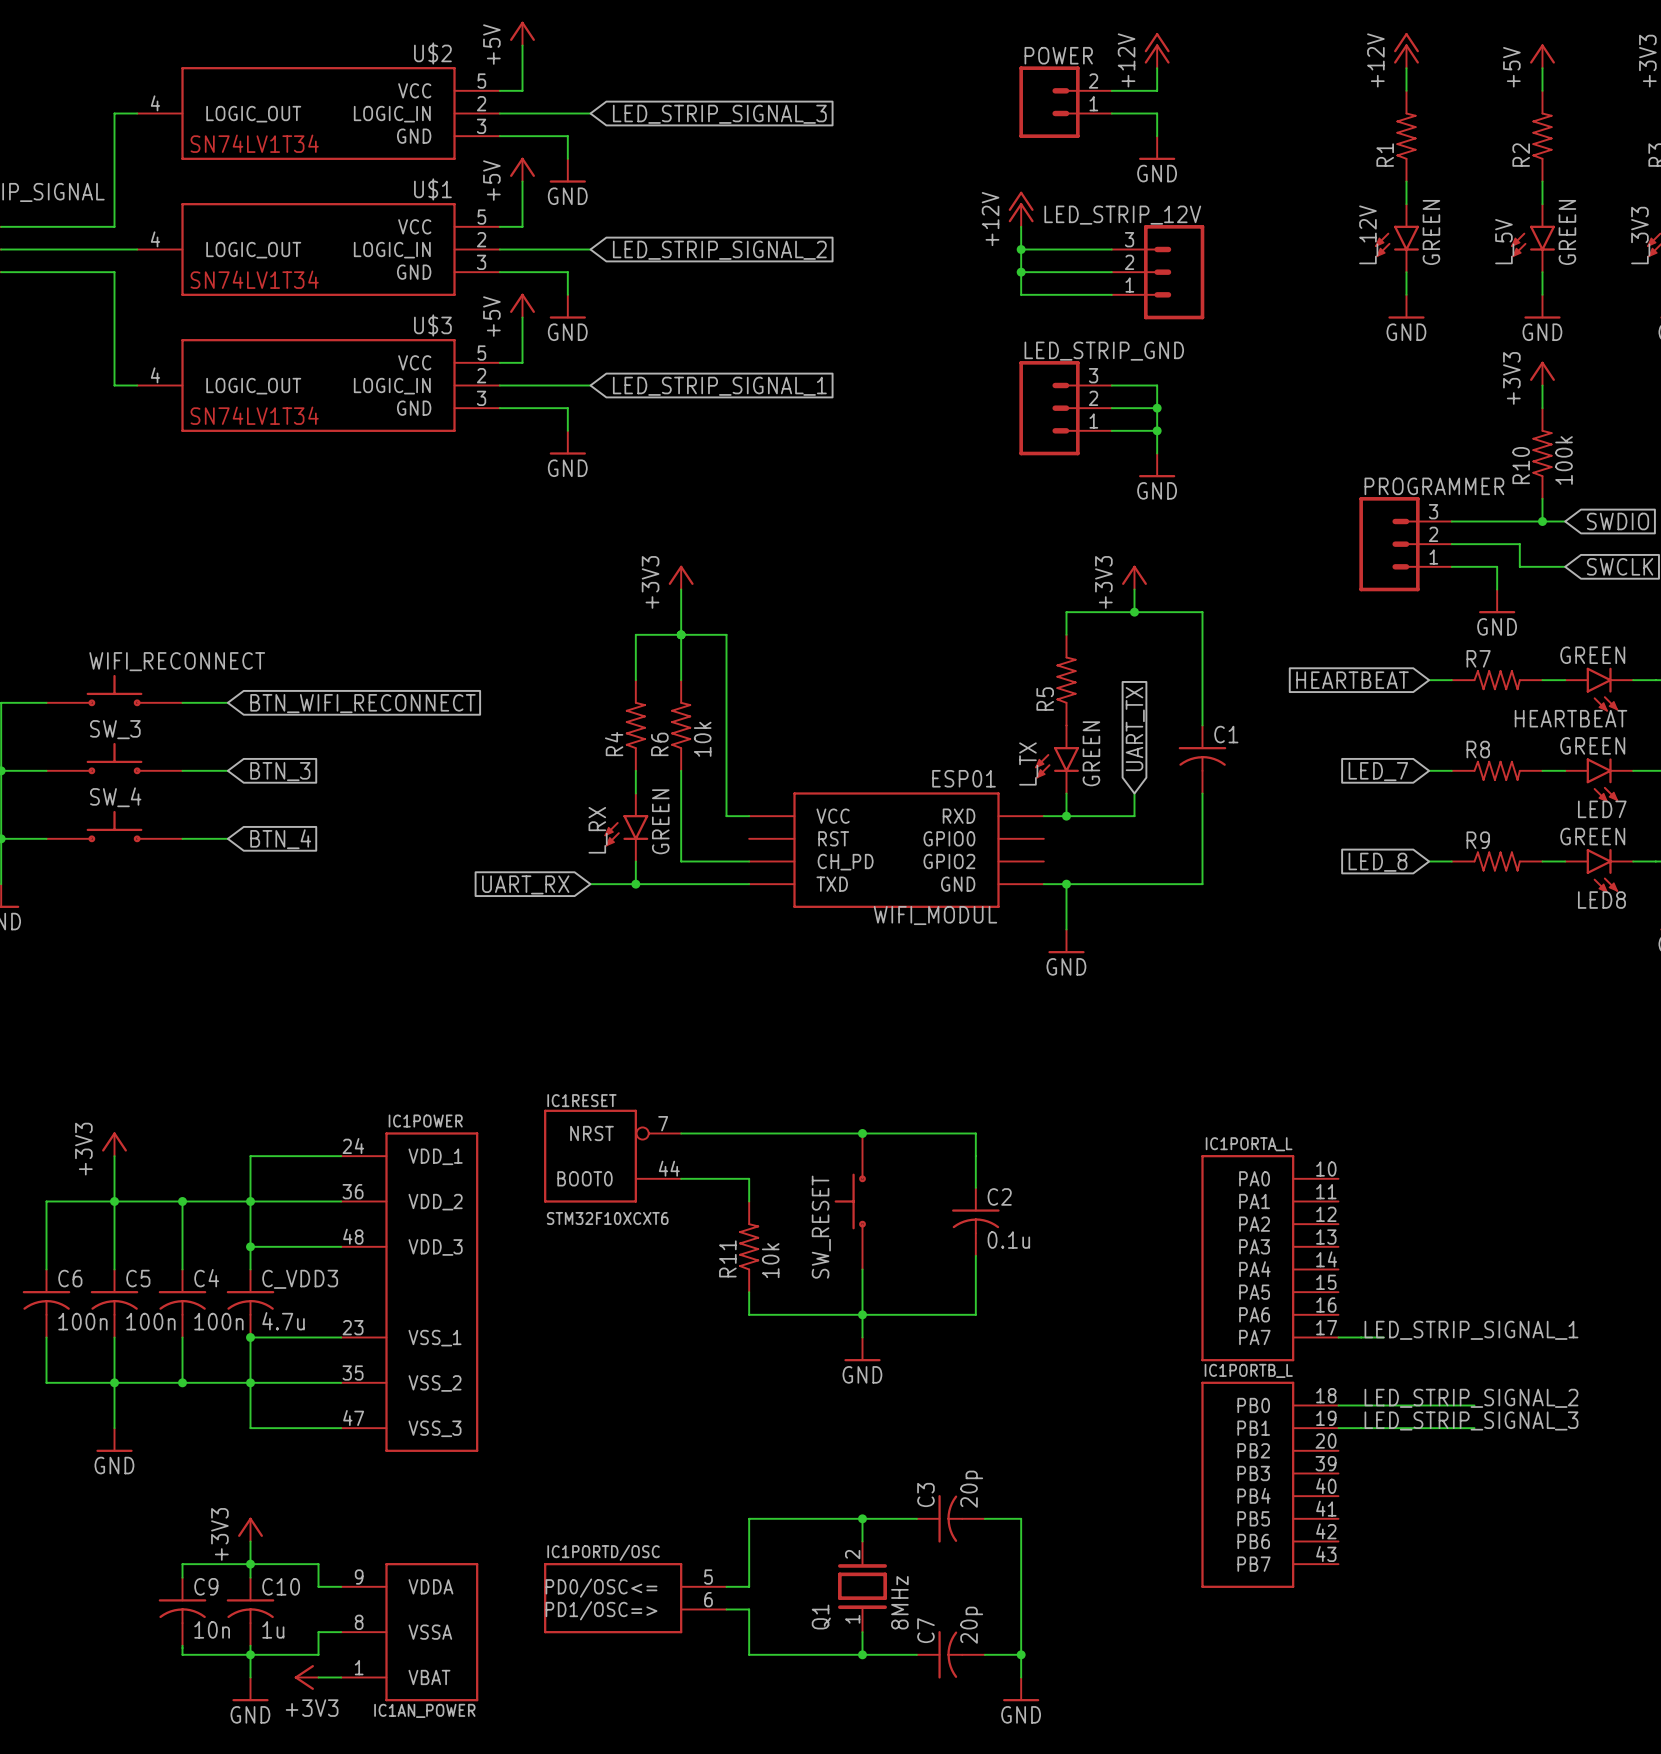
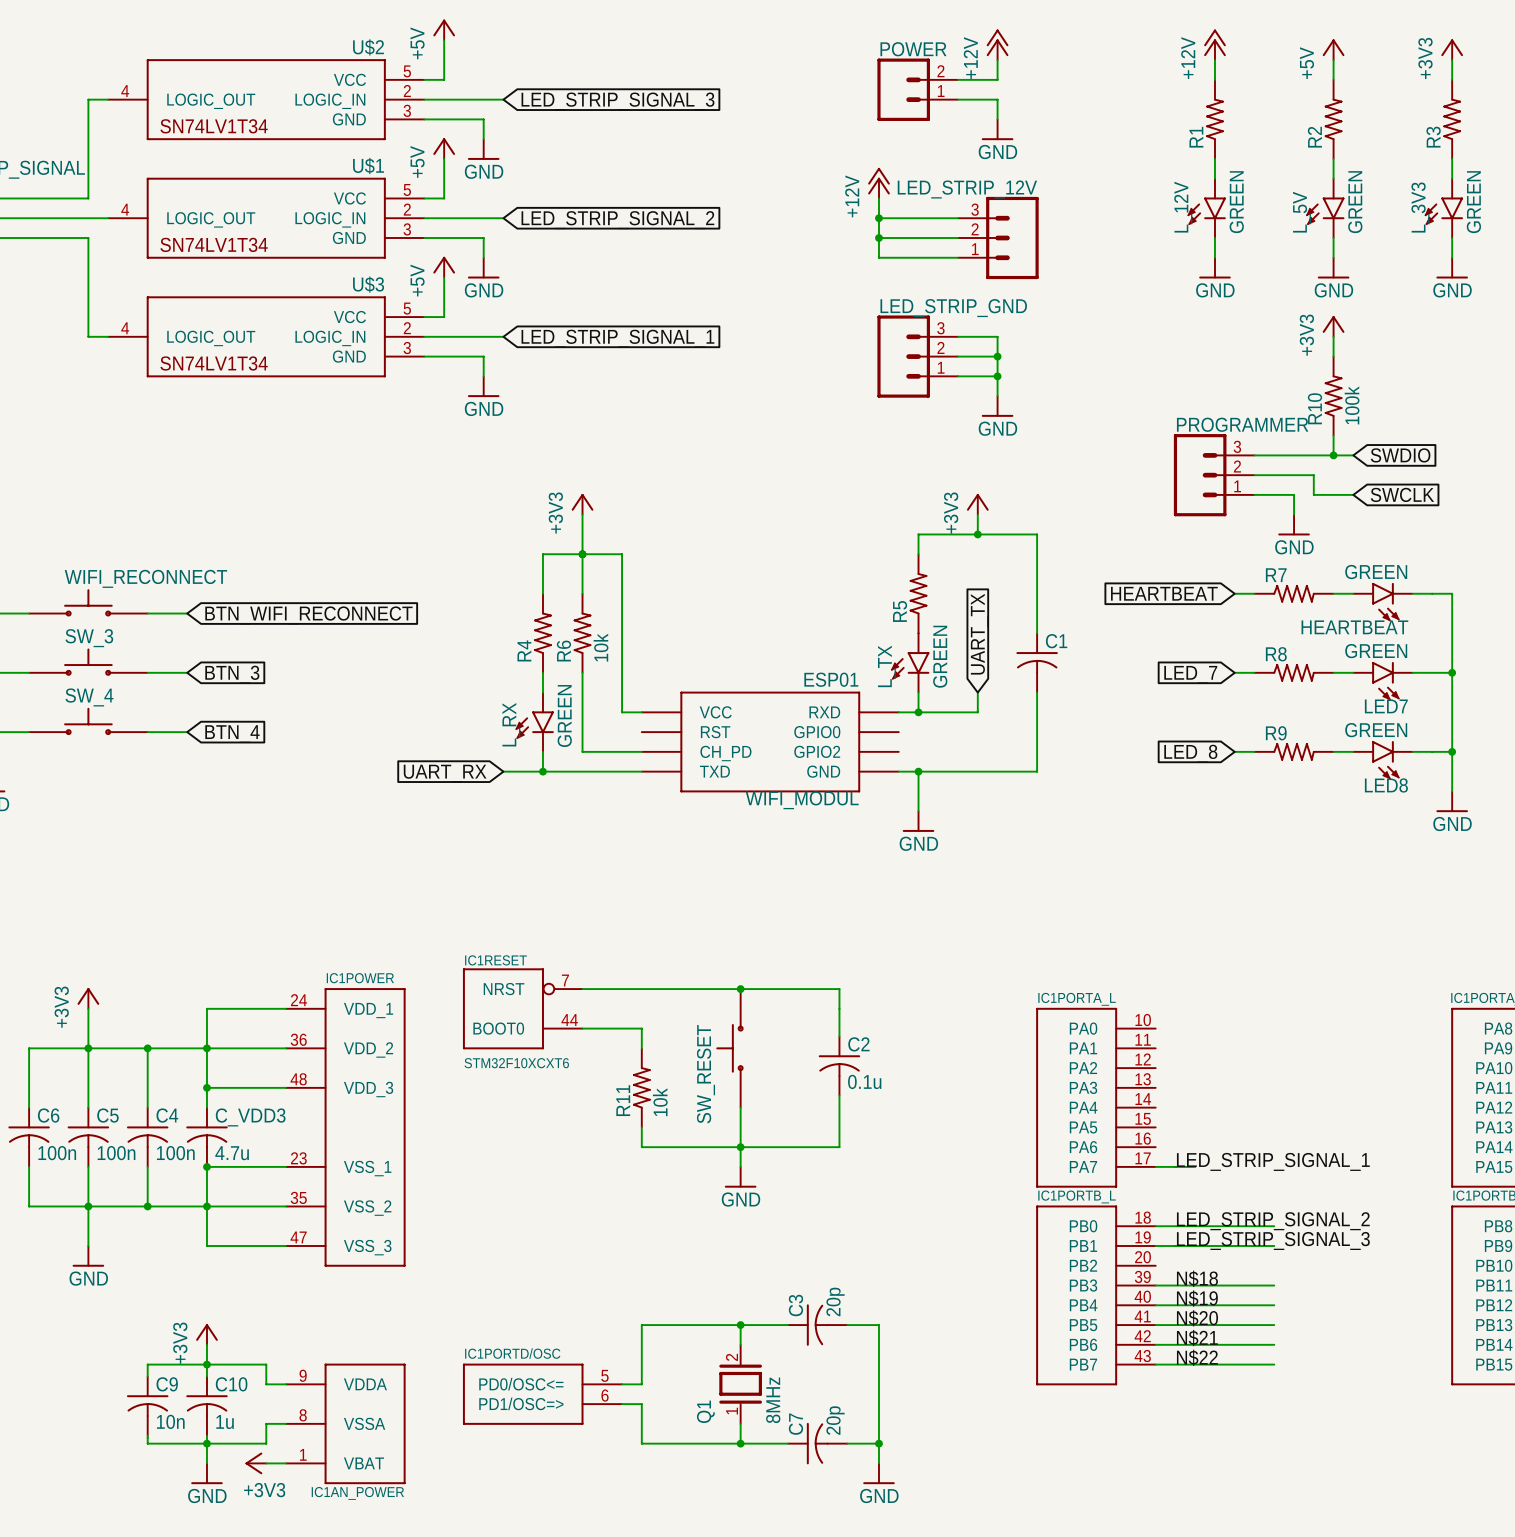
label: none -> N$18 (1197, 1278)
wire: none -> (1155, 1285) (1274, 1285)
label: none -> N$19 (1197, 1298)
wire: none -> (1155, 1305) (1274, 1305)
label: none -> N$20 (1197, 1318)
wire: none -> (1155, 1325) (1274, 1325)
label: none -> N$21 (1197, 1338)
wire: none -> (1155, 1344) (1274, 1344)
label: none -> N$22 (1197, 1357)
wire: none -> (1155, 1364) (1274, 1364)

